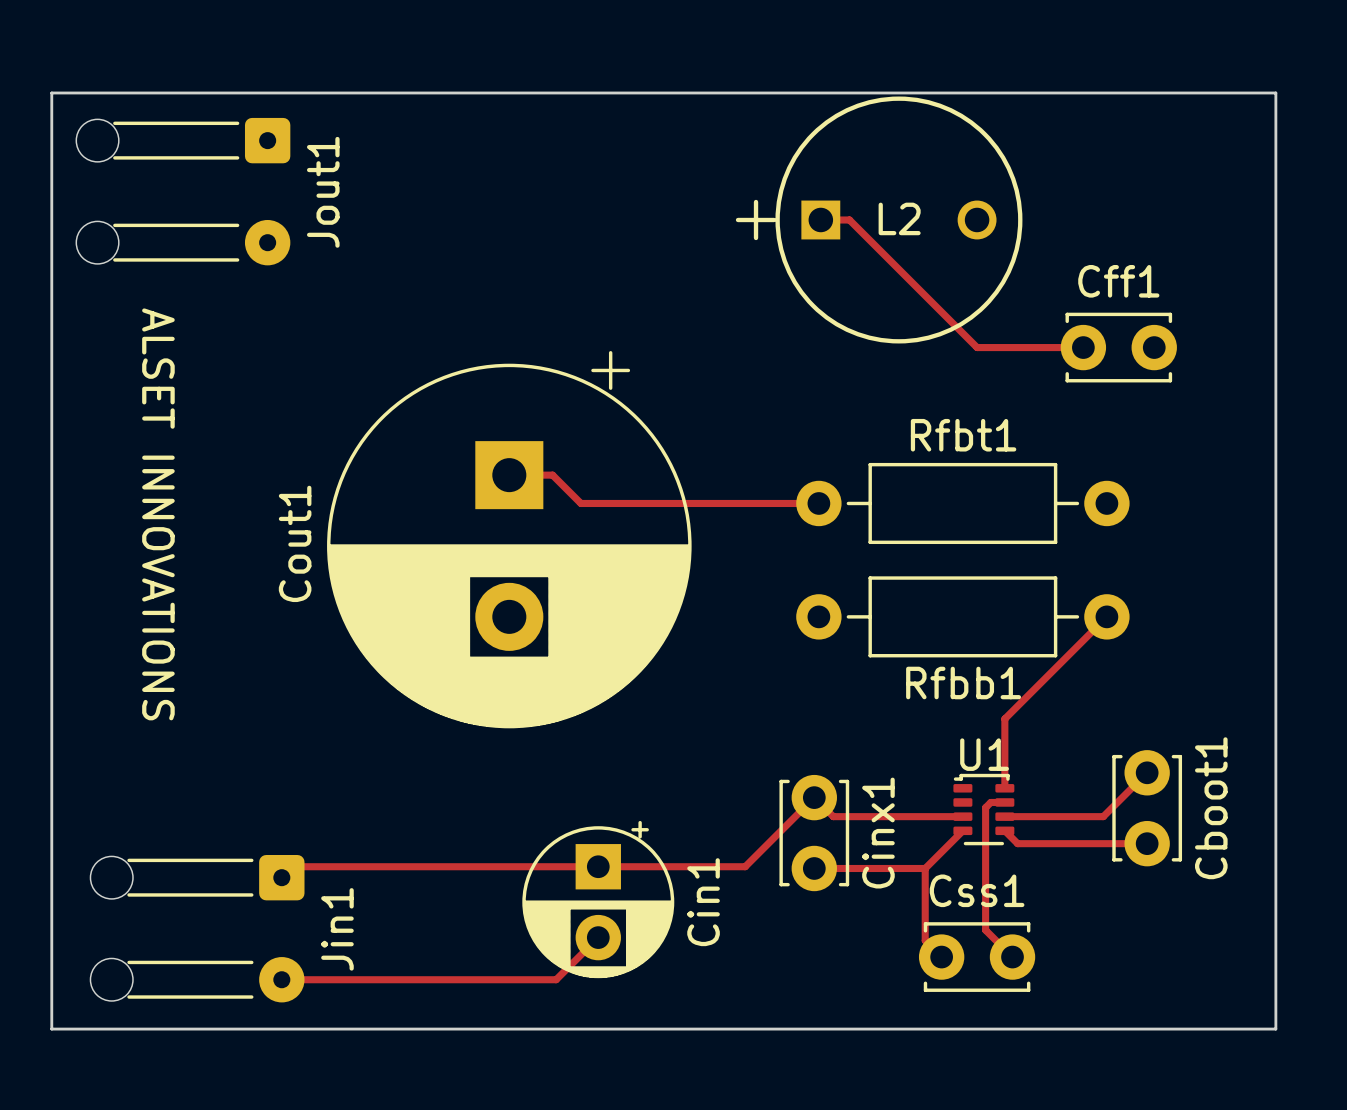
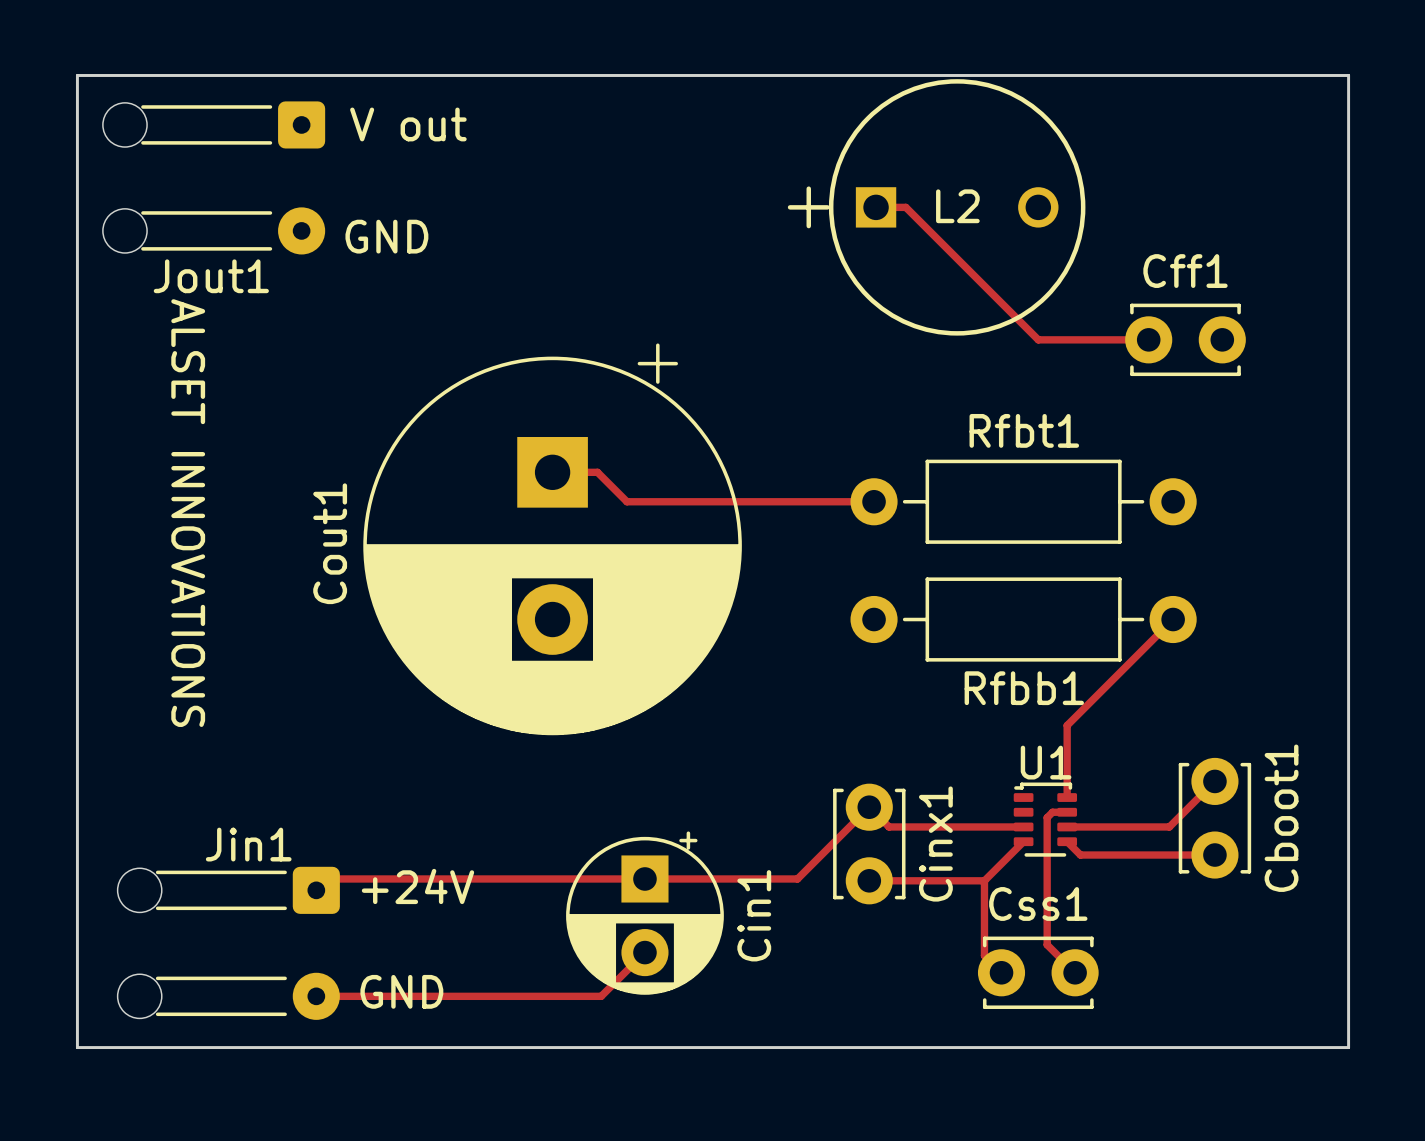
text: none -> V out (408, 124)
Jout1 name rotation: 0° (323, 192) -> 90° clockwise (211, 276)
Jout1 name position: Jout1 (323, 192) -> Jout1 (211, 276)
text: none -> GND (386, 236)
text: none -> +24V (417, 886)
Jin1 name rotation: 0° (337, 929) -> 90° clockwise (248, 844)
Jin1 name position: Jin1 (337, 929) -> Jin1 (248, 844)
text: none -> GND (401, 991)

